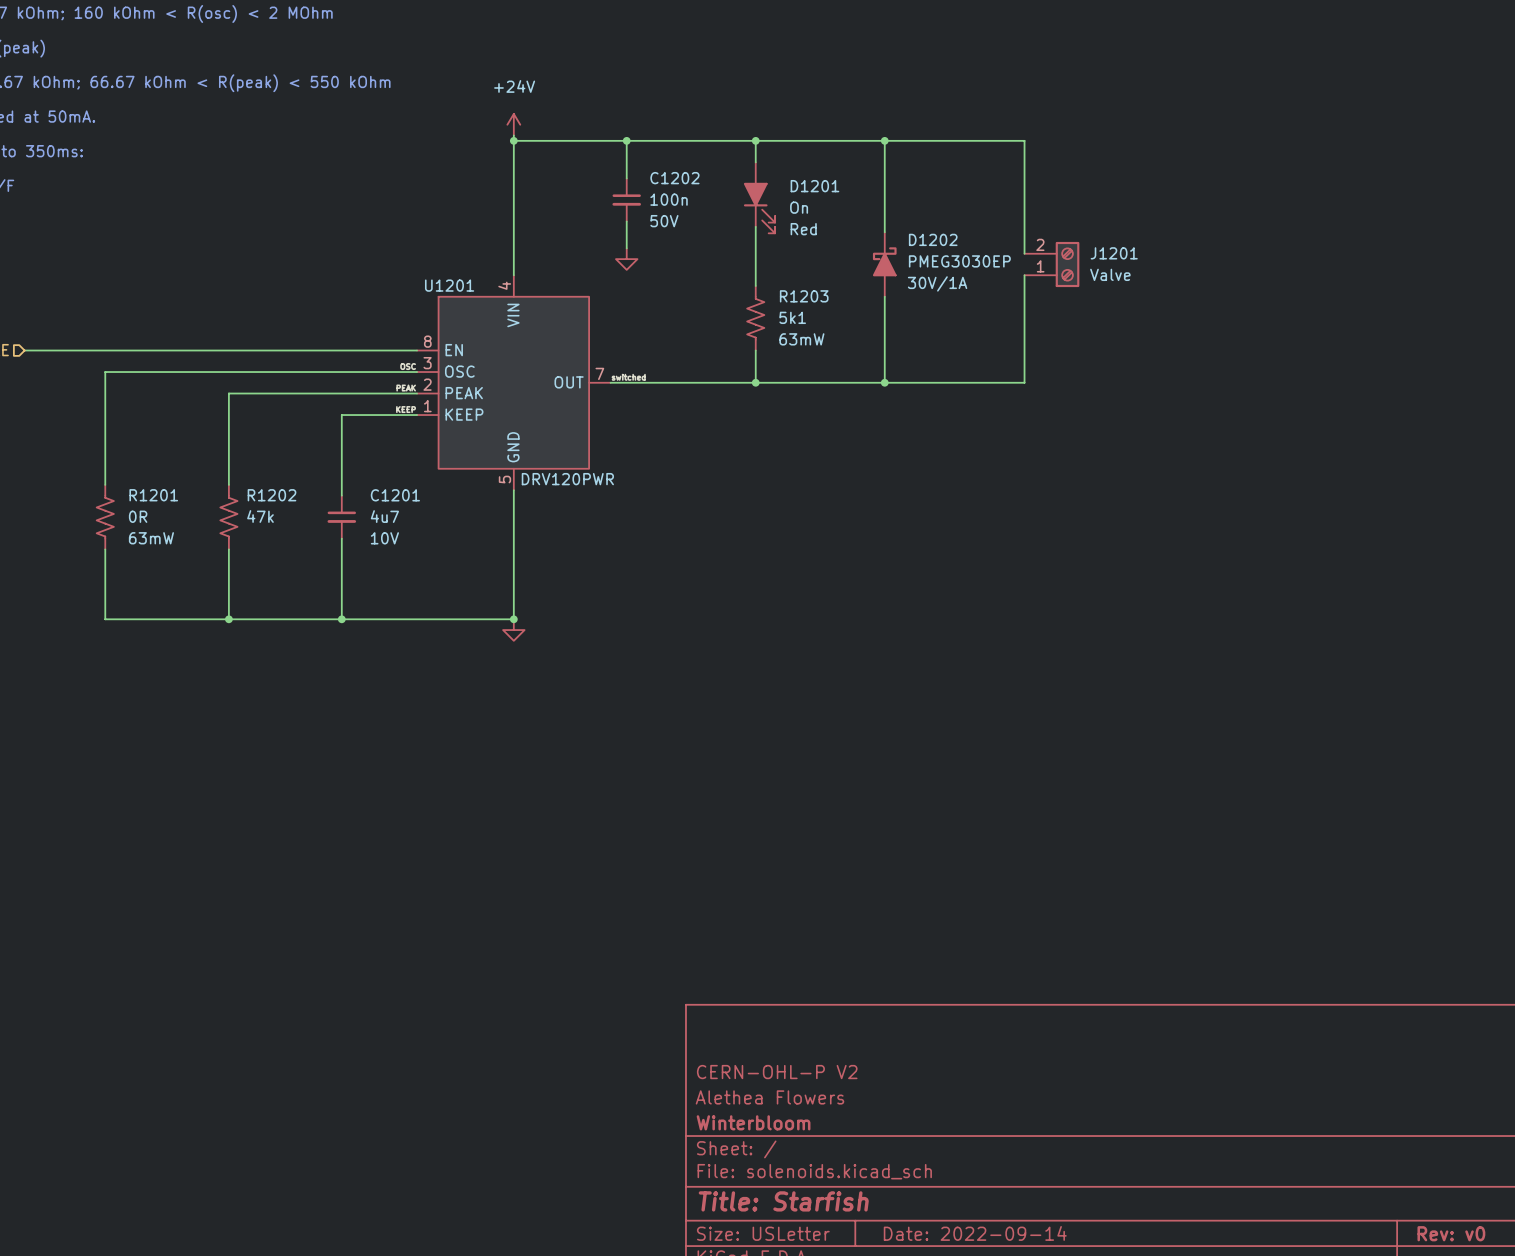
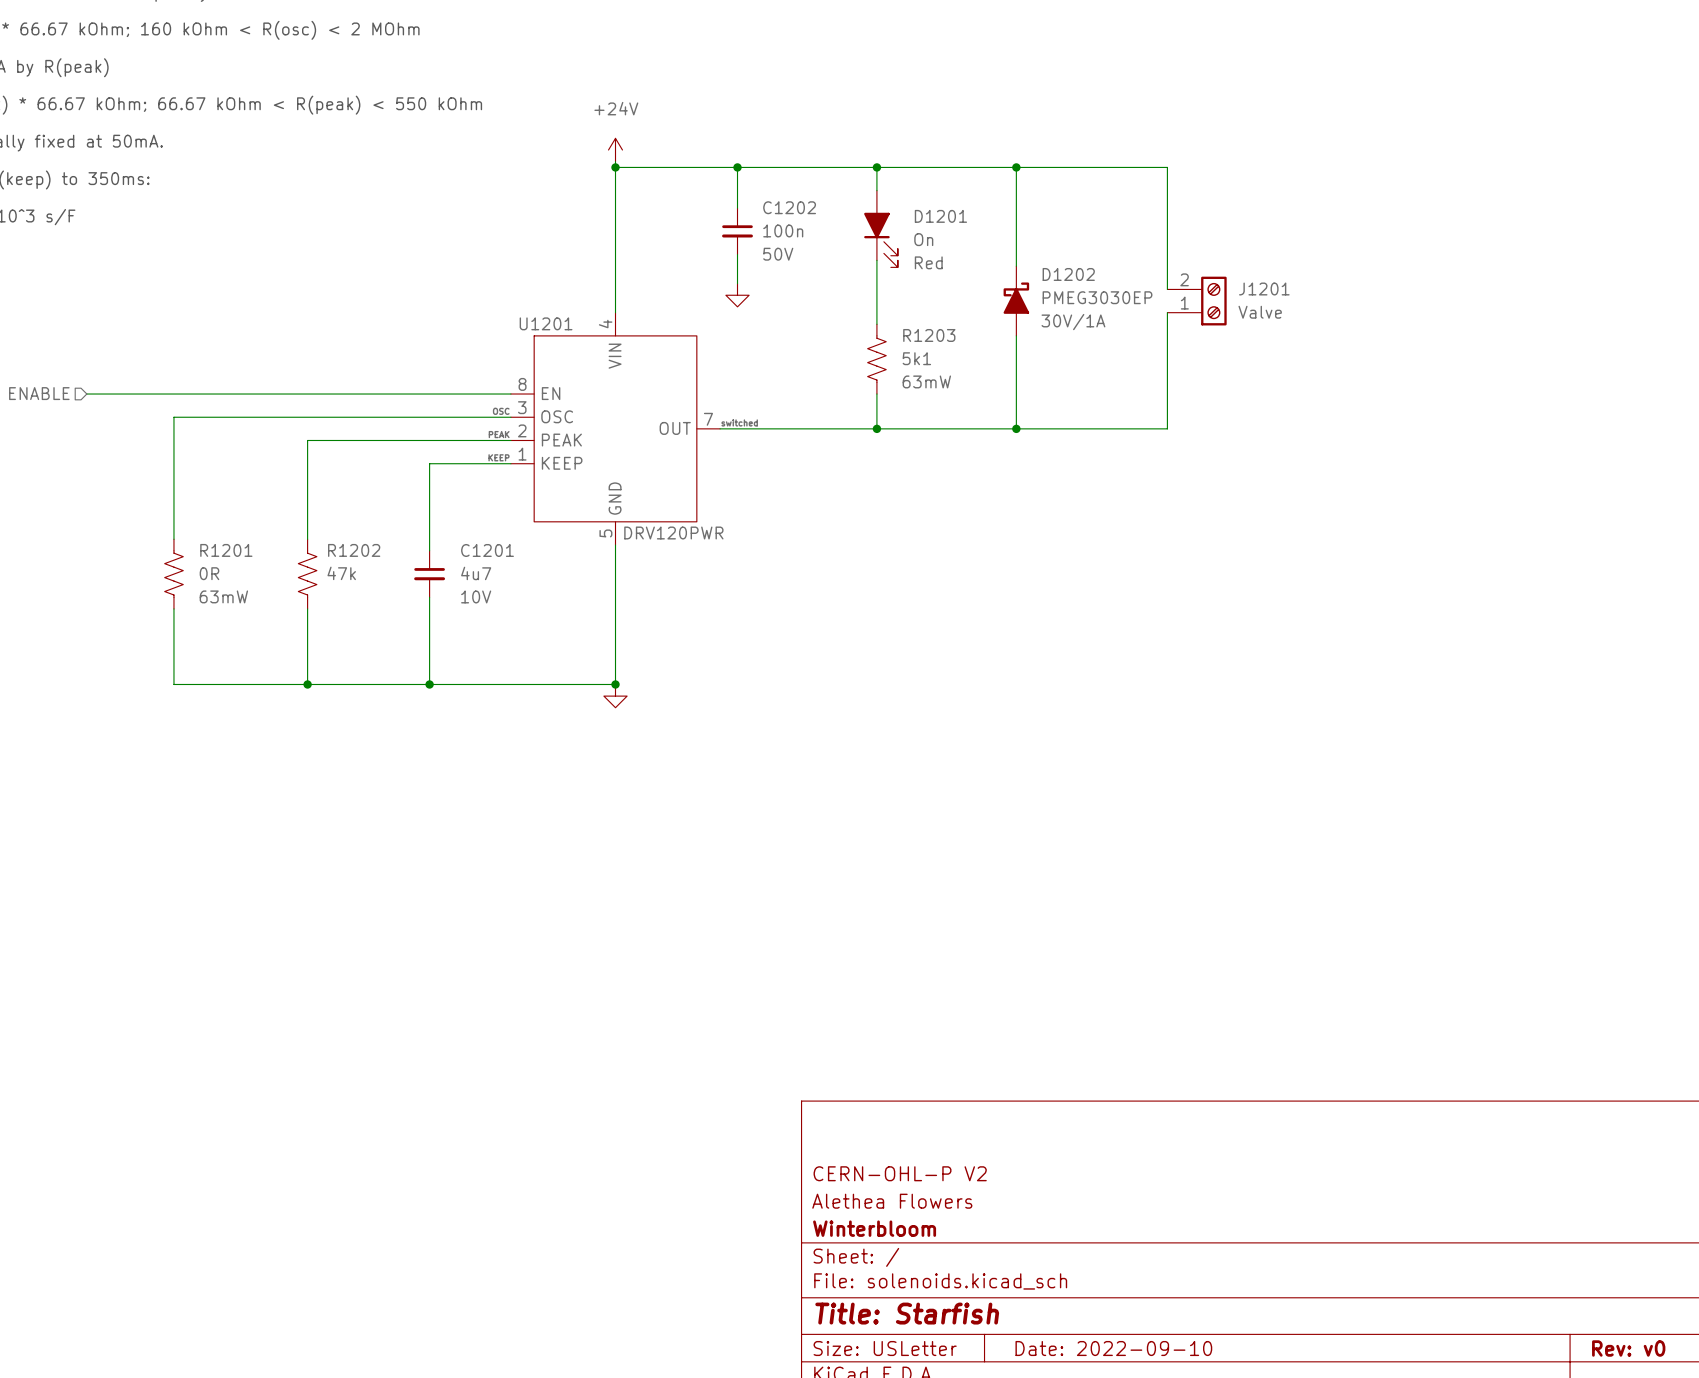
title block: Date: 2022-09-14 (975, 1233) -> Date: 2022-09-10 (1113, 1348)

